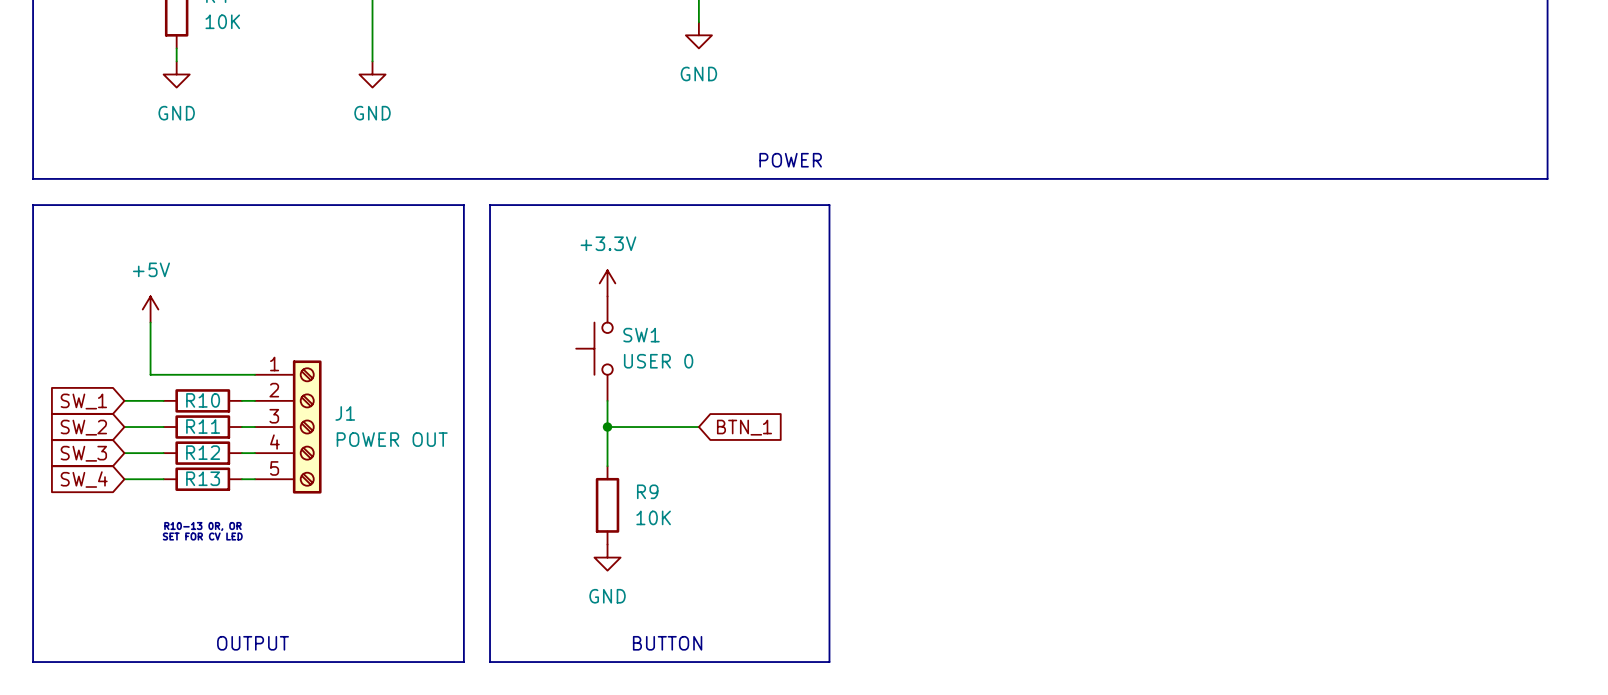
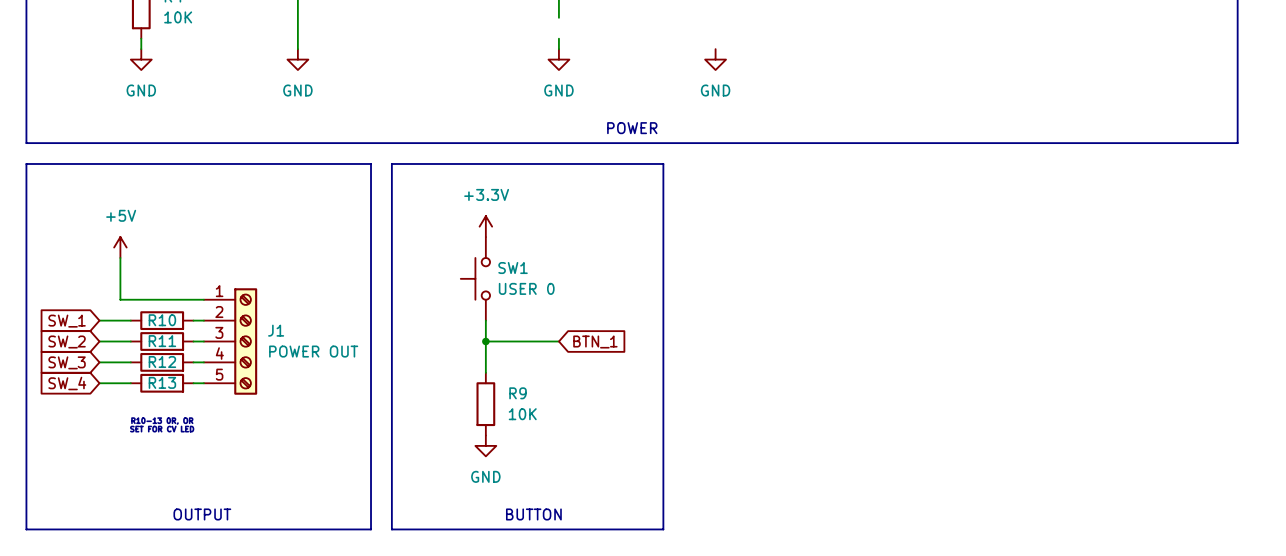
power symbol position: GND (698, 35) -> GND (558, 59)
wire: none -> (558, 38) (558, 49)
power symbol: none -> GND (715, 59)

